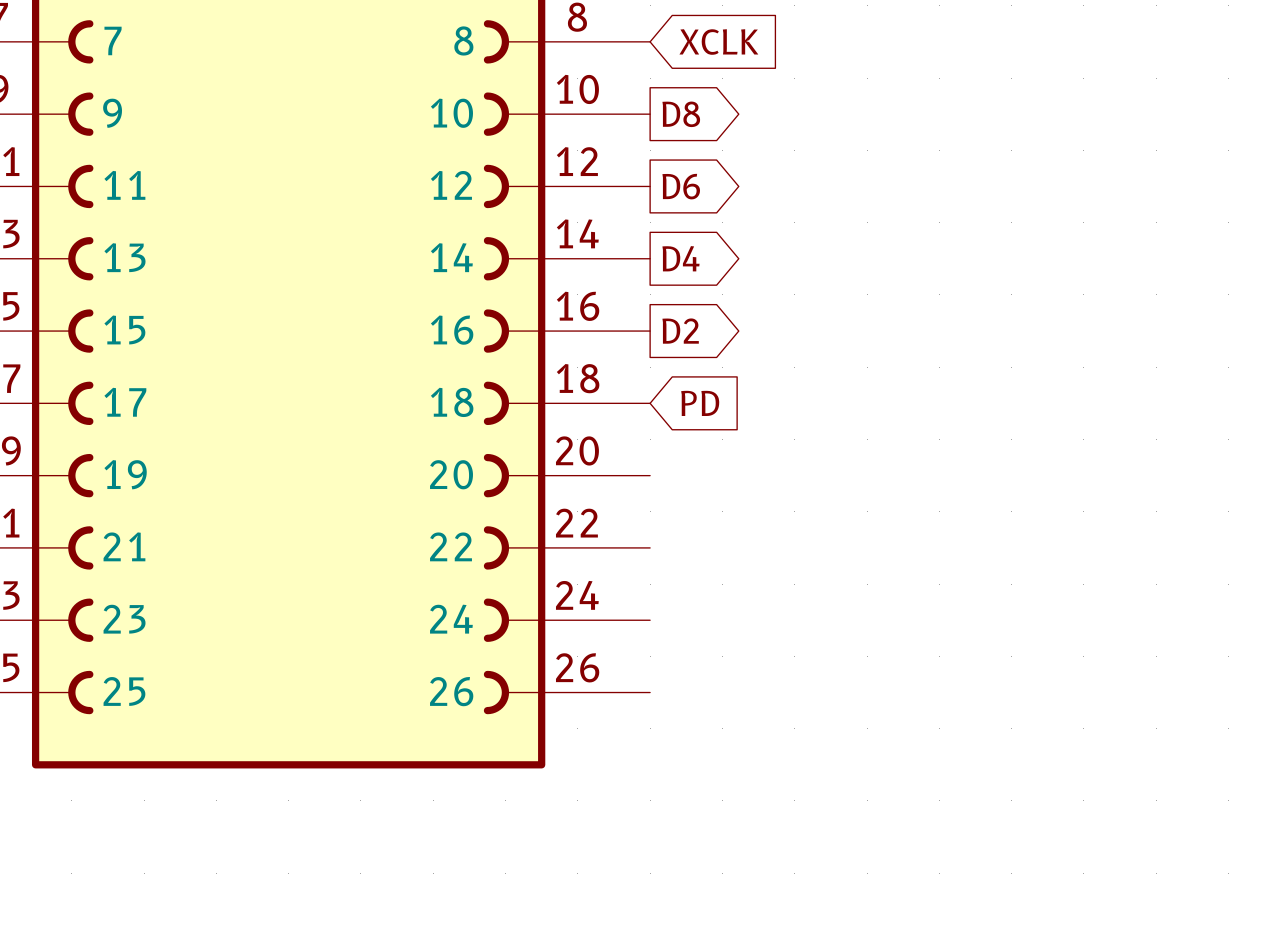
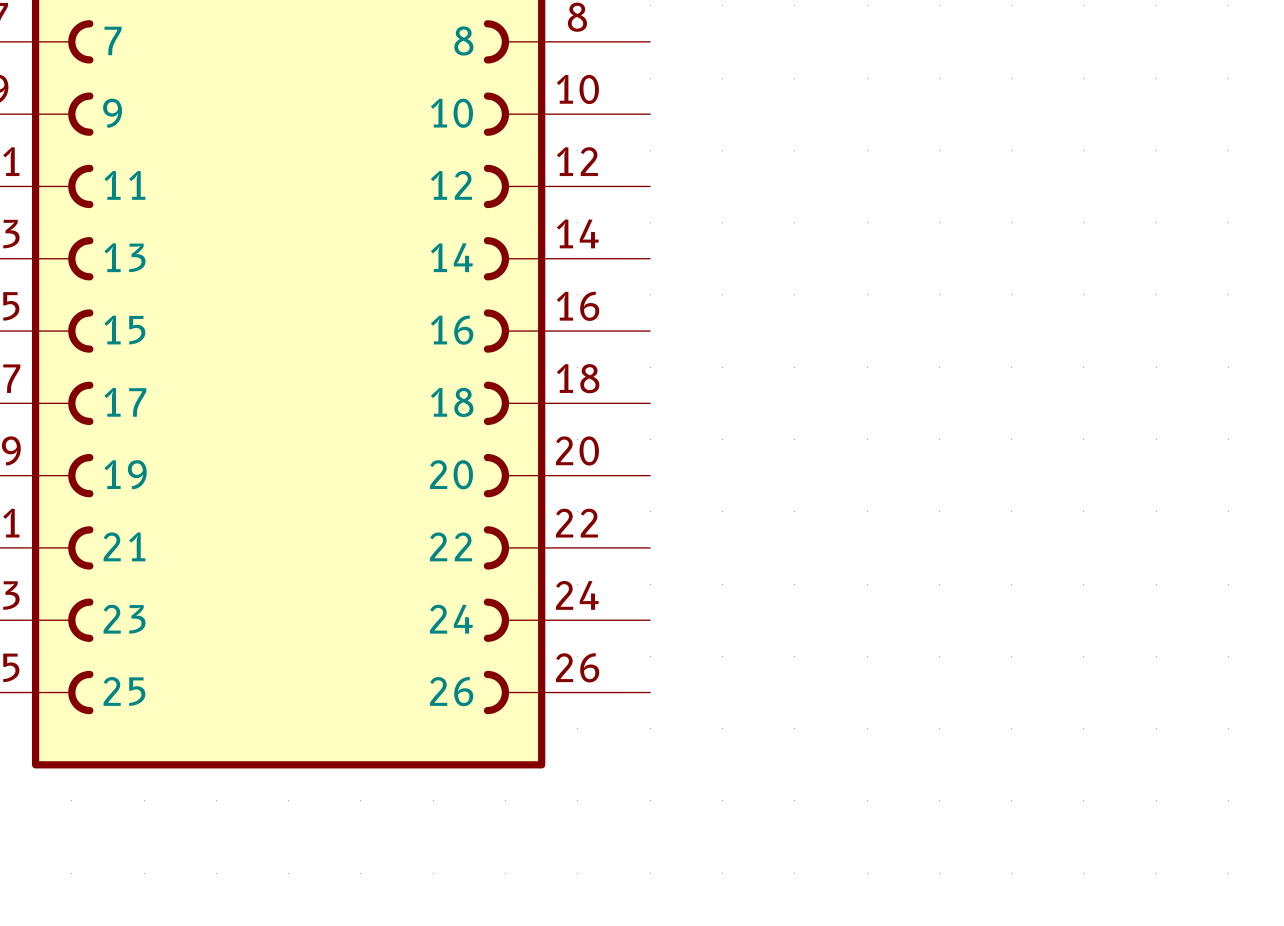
global label: XCLK (718, 42) -> none
global label: D8 (681, 114) -> none
global label: D6 (681, 186) -> none
global label: D4 (680, 258) -> none
global label: D2 (680, 331) -> none
global label: PD (700, 403) -> none

